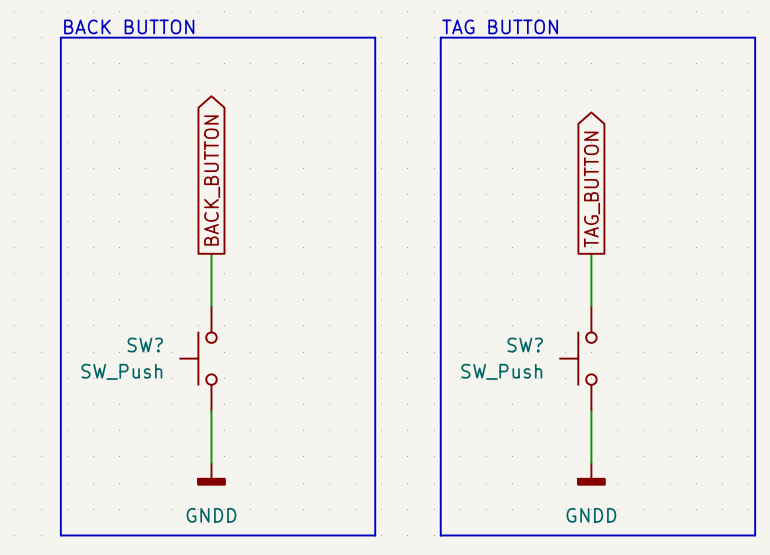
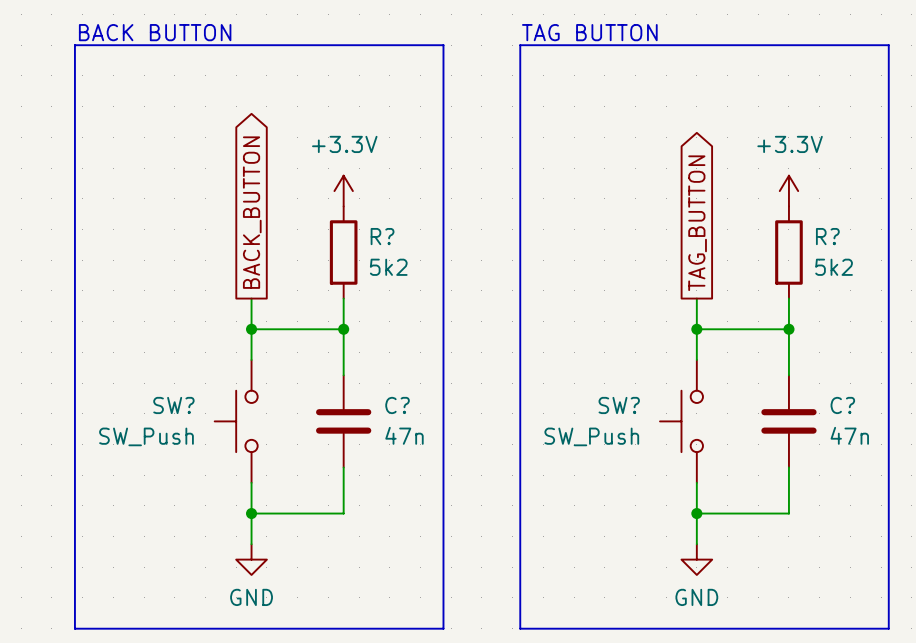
power symbol: none -> +3.3V (343, 191)
power symbol: none -> +3.3V (788, 191)
R?: none -> 5k2 (343, 252)
R?: none -> 5k2 (788, 252)
wire: none -> (343, 298) (343, 375)
wire: none -> (788, 298) (788, 375)
wire: none -> (251, 329) (343, 329)
junction: none -> (251, 329)
junction: none -> (343, 329)
wire: none -> (696, 329) (788, 329)
junction: none -> (696, 329)
junction: none -> (788, 329)
C?: none -> 47n (343, 421)
C?: none -> 47n (788, 421)
wire: none -> (343, 467) (343, 513) (251, 513)
wire: none -> (788, 467) (788, 513) (696, 513)
junction: none -> (251, 513)
junction: none -> (696, 513)
power symbol: GNDD (211, 474) -> GND (251, 559)
power symbol: GNDD (591, 474) -> GND (696, 559)

